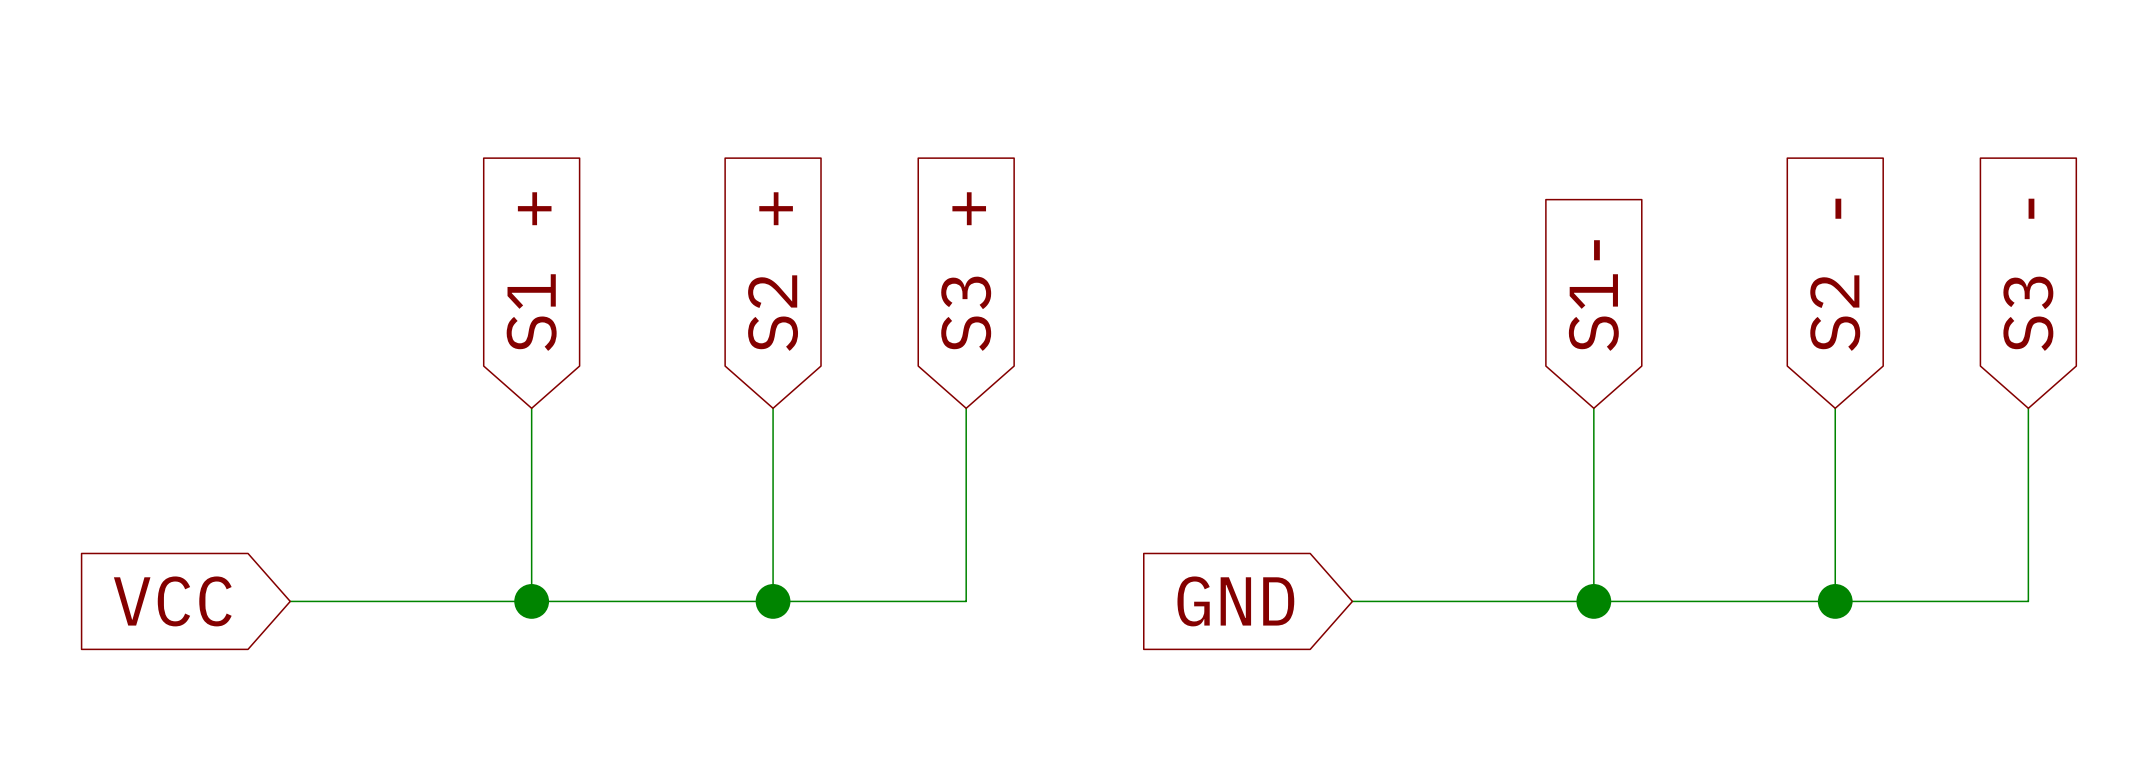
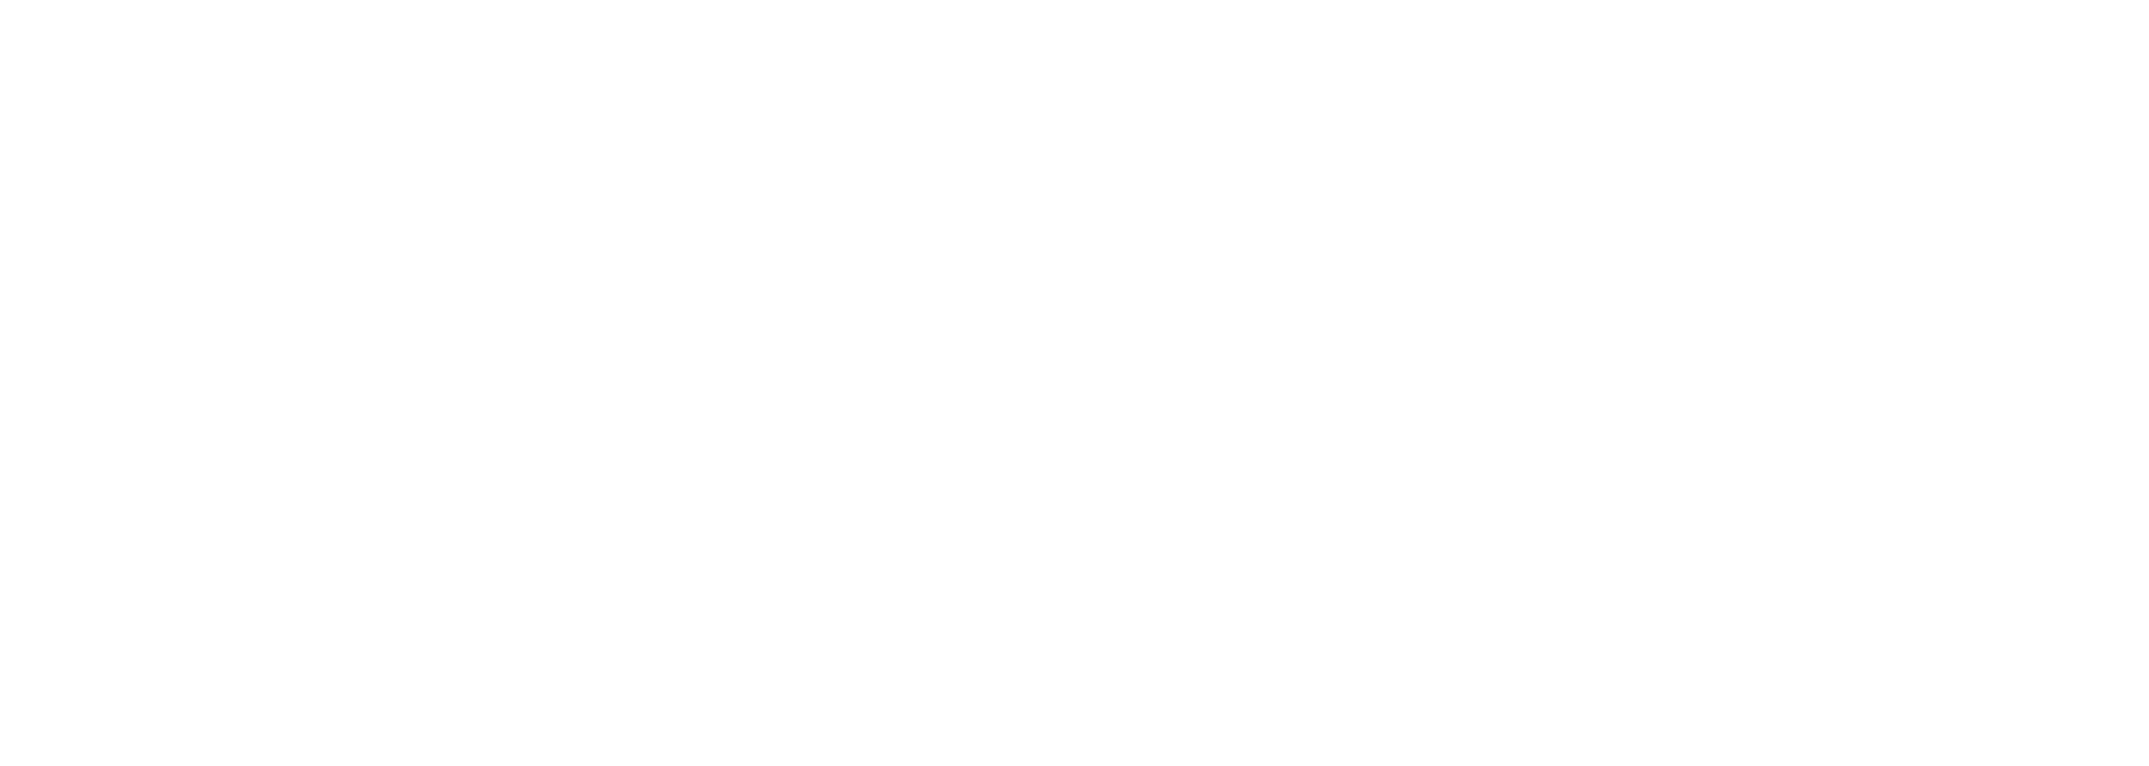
global label: S1 + (531, 271) -> none
global label: S2 + (773, 271) -> none
global label: S3 + (966, 271) -> none
global label: S2 - (1835, 274) -> none
global label: S3 - (2028, 274) -> none
global label: S1- (1593, 295) -> none
wire: (531, 408) (531, 601) -> none
wire: (773, 408) (773, 601) -> none
wire: (966, 408) (966, 601) (290, 601) -> none
wire: (1593, 408) (1593, 601) -> none
wire: (1835, 408) (1835, 601) -> none
wire: (2028, 408) (2028, 601) (1352, 601) -> none
global label: VCC (172, 601) -> none
junction: (531, 601) -> none
junction: (773, 601) -> none
global label: GND (1235, 601) -> none
junction: (1593, 601) -> none
junction: (1835, 601) -> none

